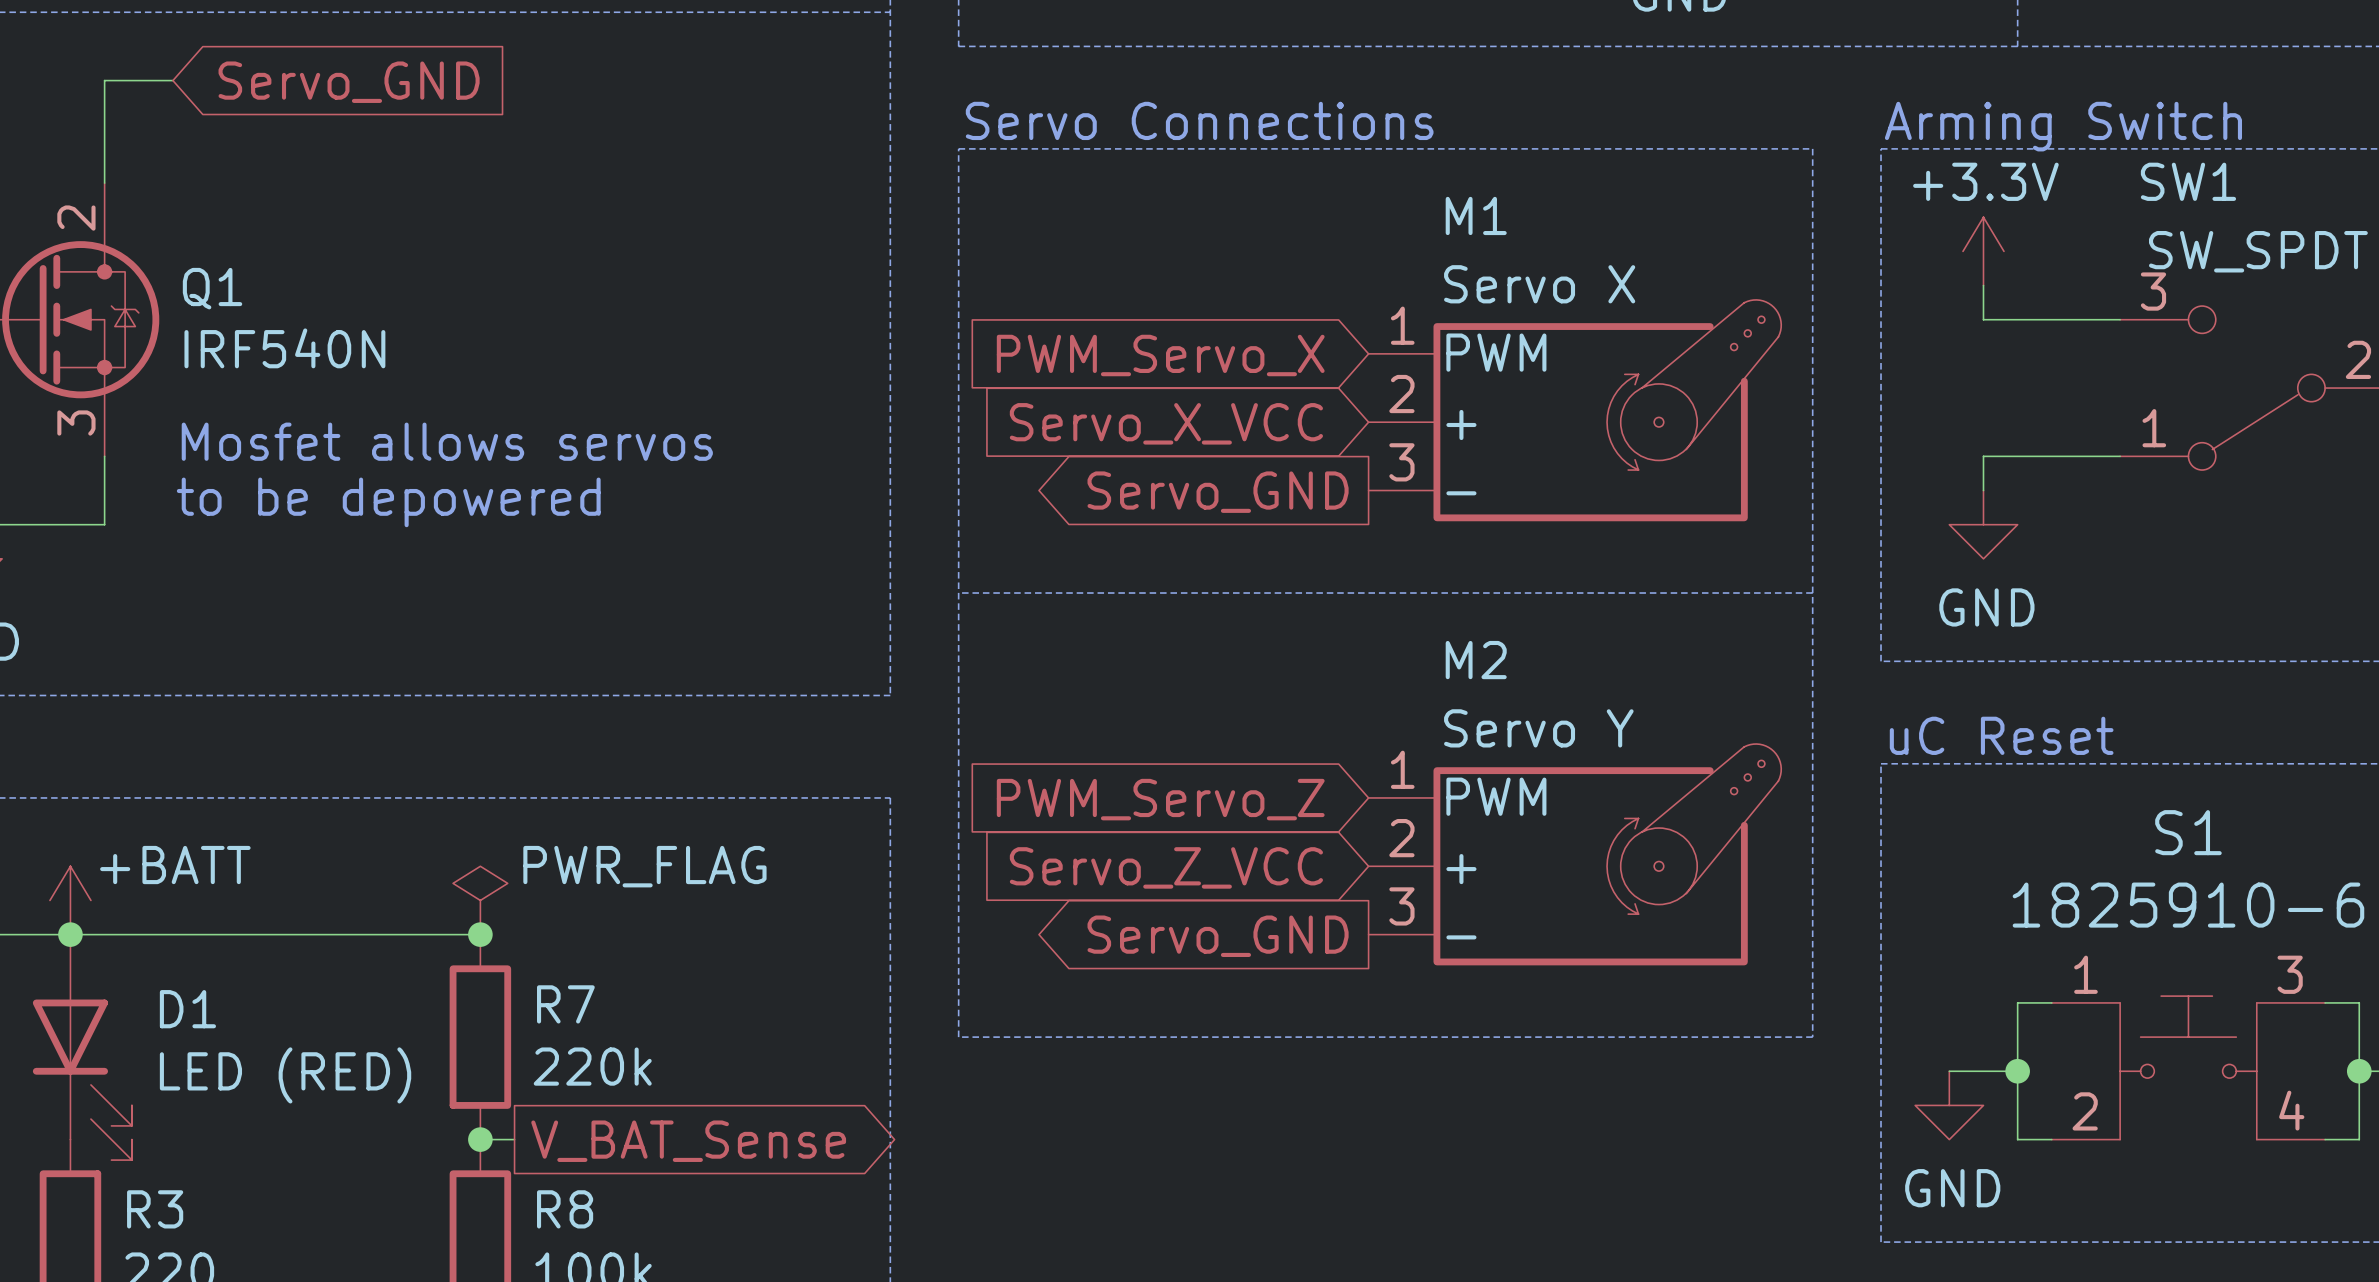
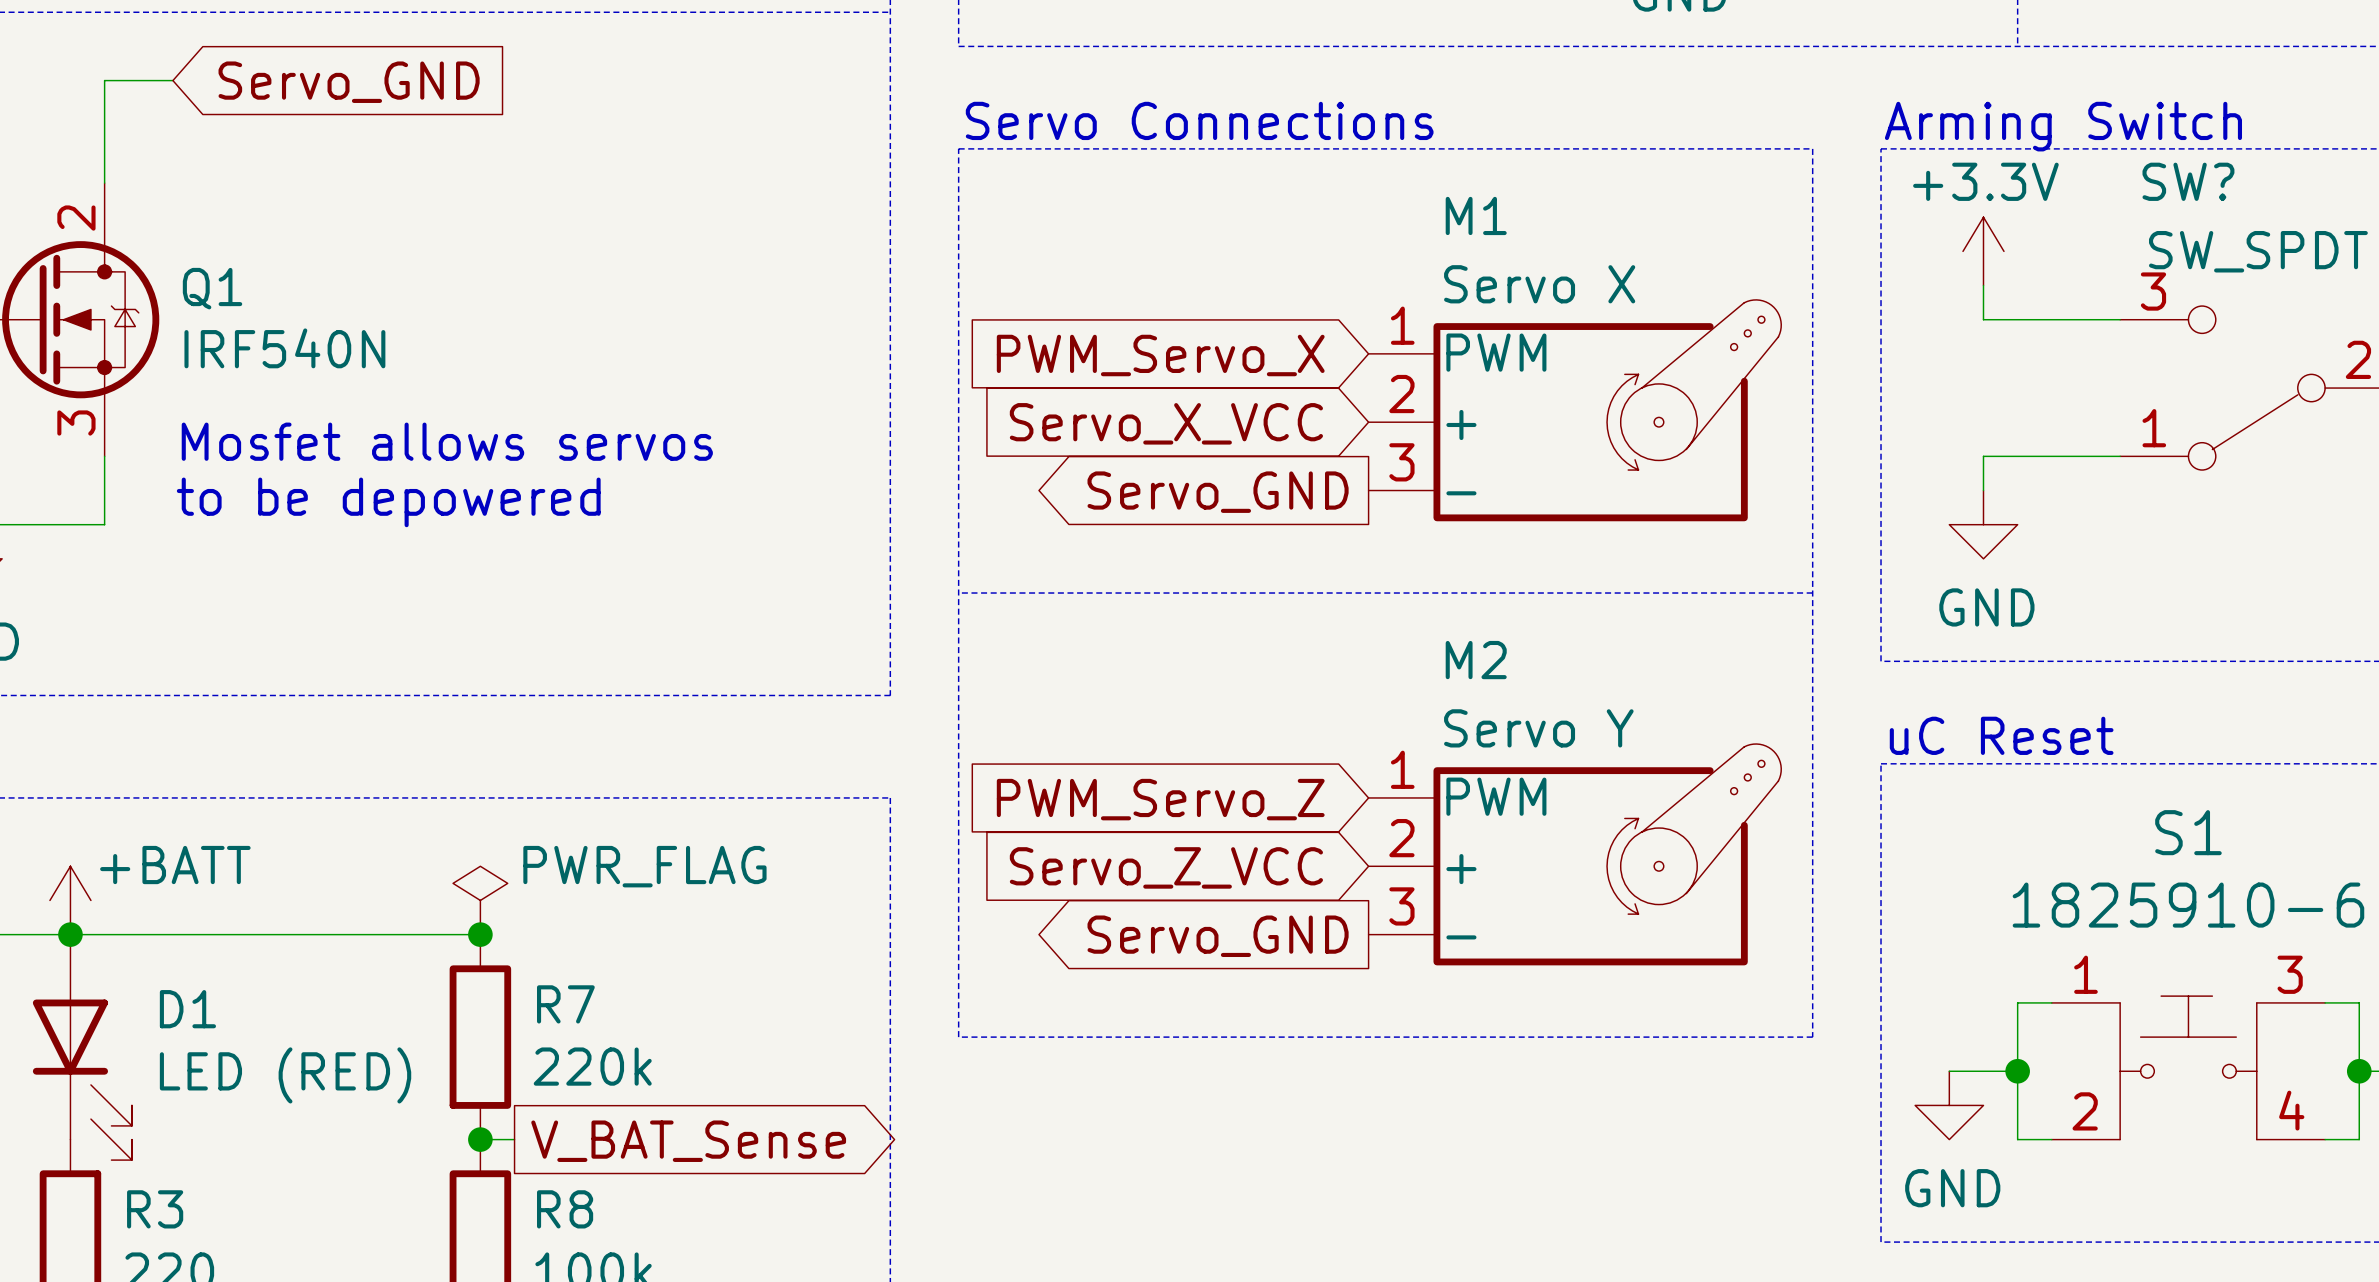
SW1 name: SW1 (2188, 181) -> SW? (2188, 181)

